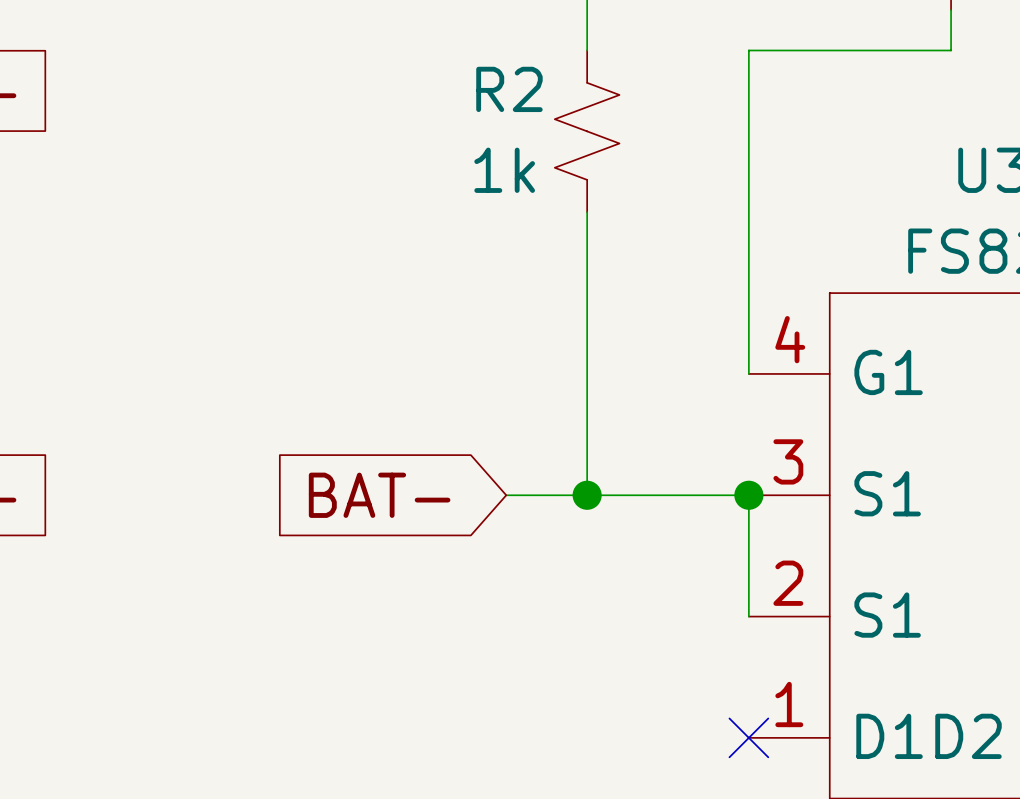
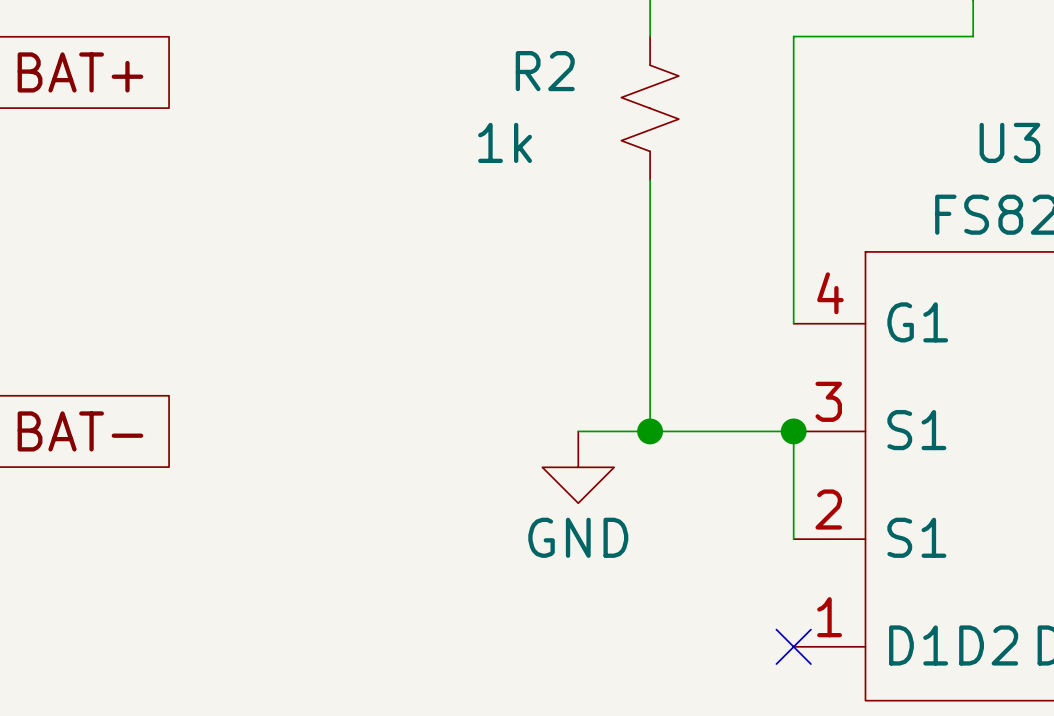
R2 name position: R2 (509, 89) -> R2 (545, 71)
R2 value position: 1k (504, 170) -> 1k (505, 142)
global label: BAT- (379, 495) -> none
power symbol: none -> GND (578, 467)

